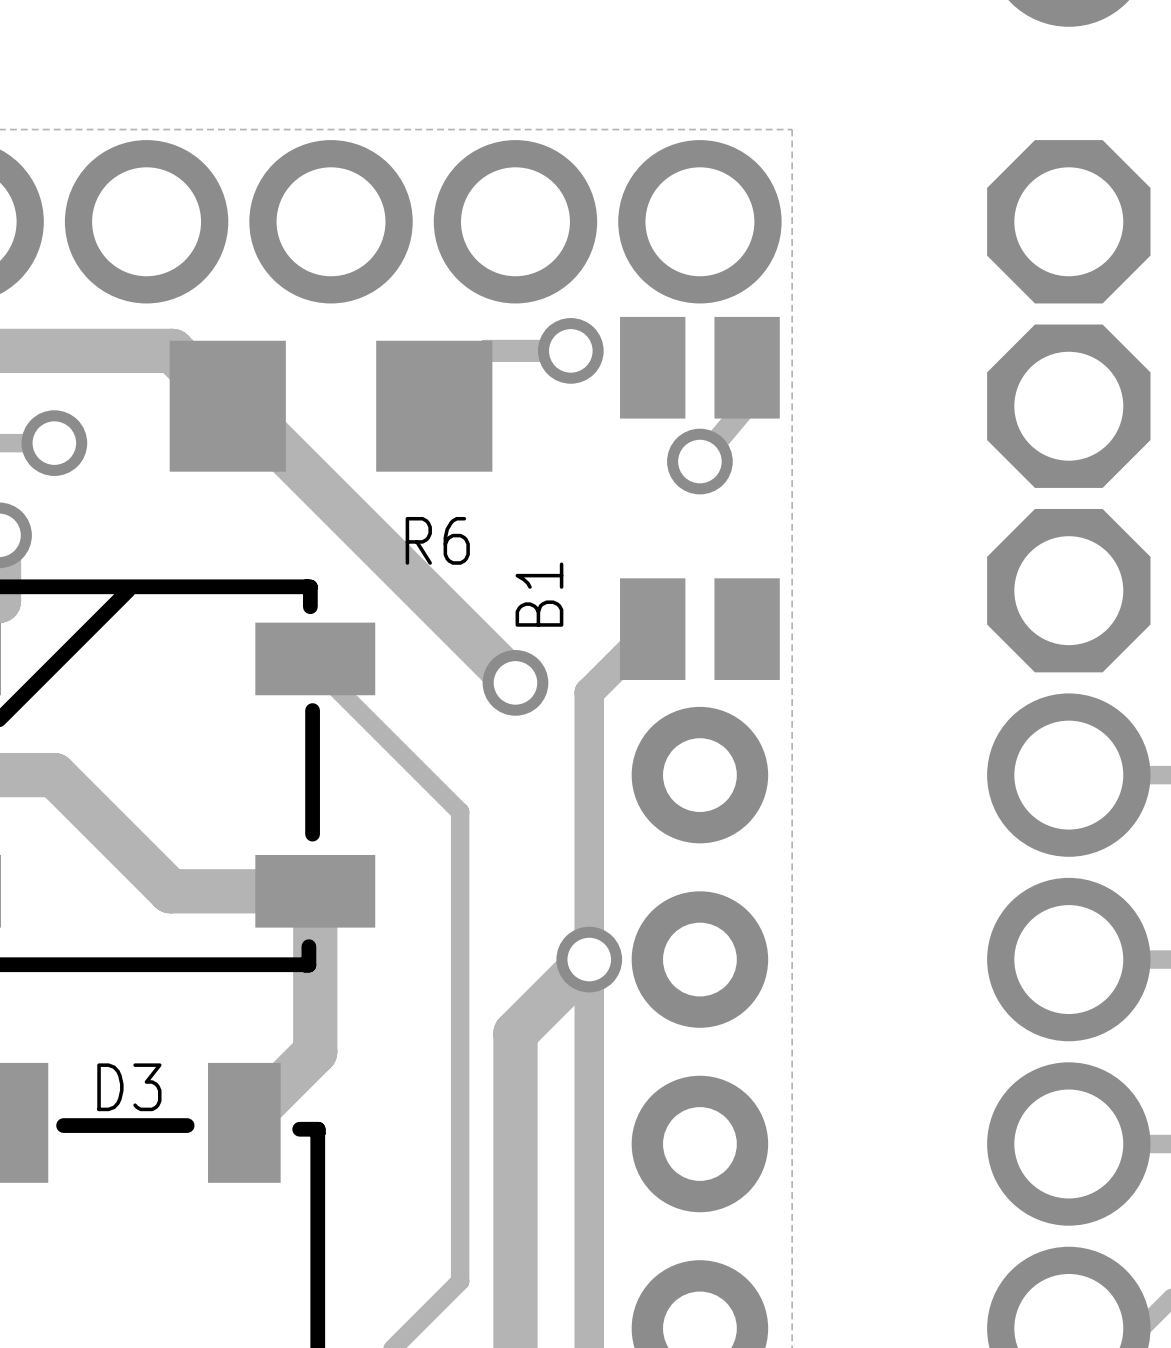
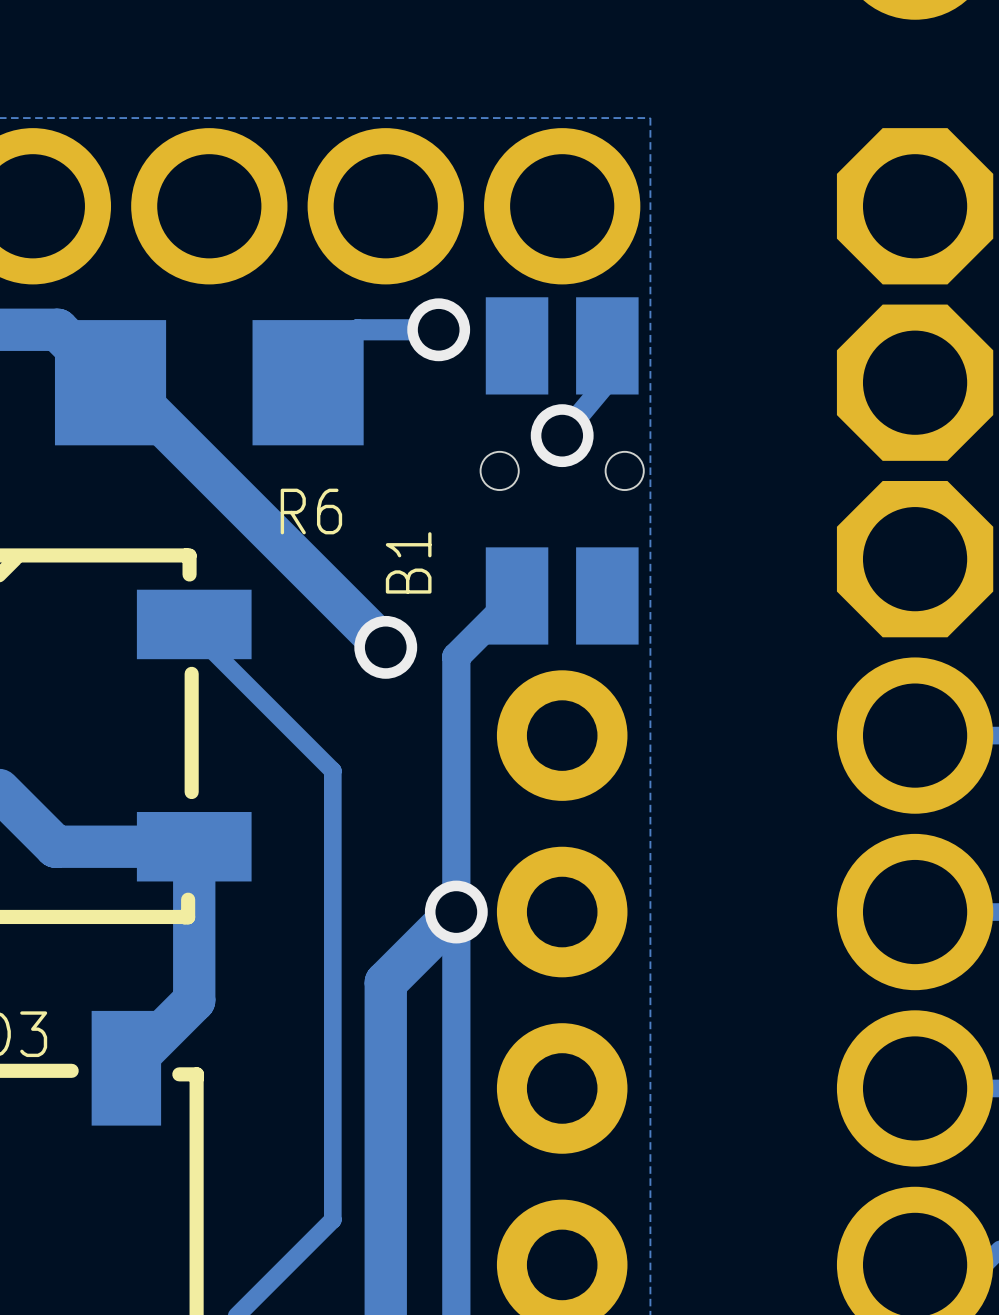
B1 footprint: [620, 316, 780, 680] -> [480, 297, 644, 645]

